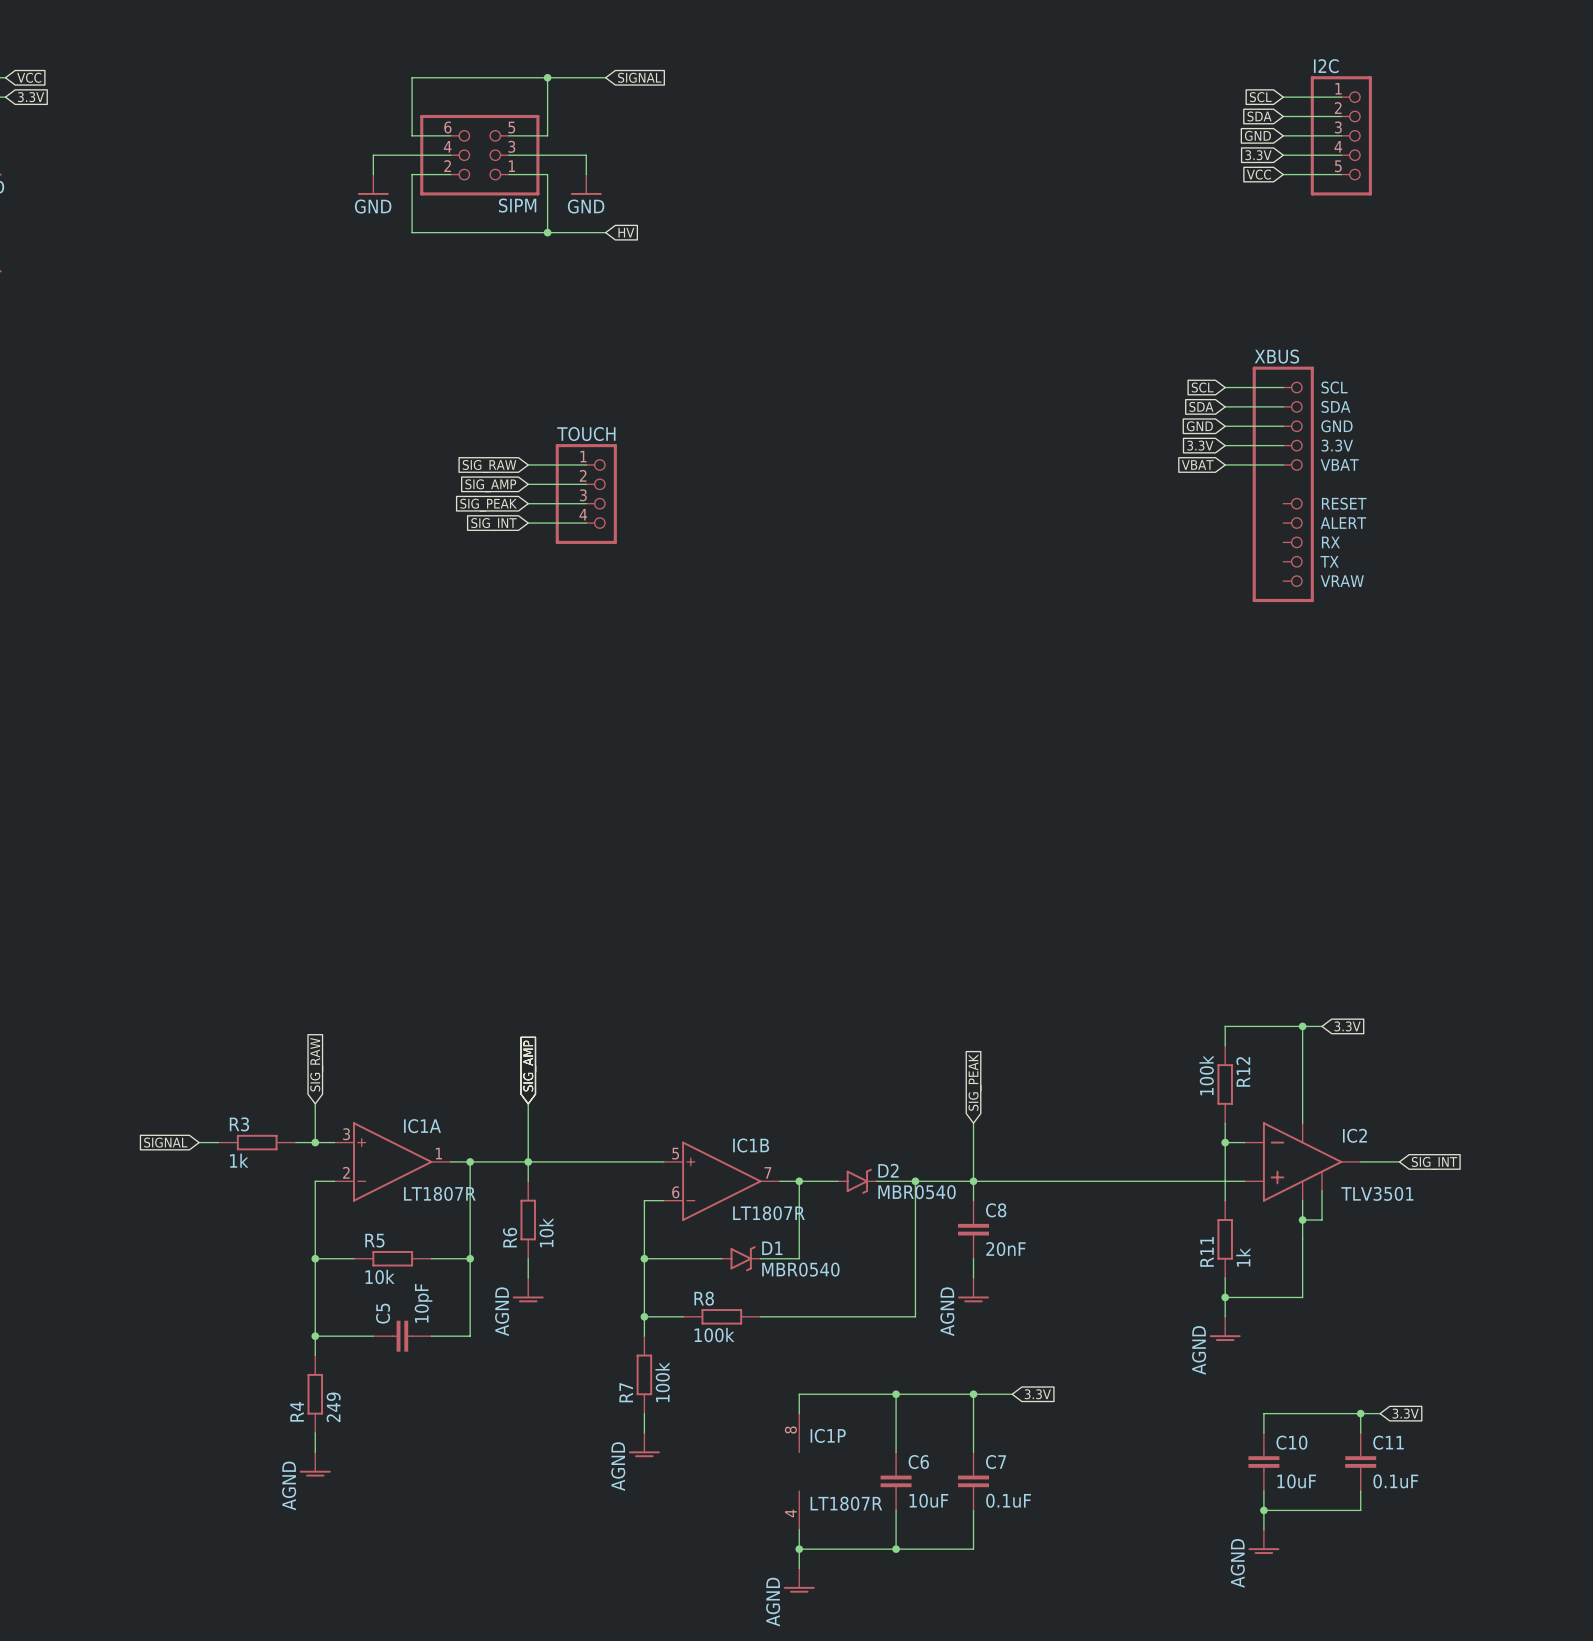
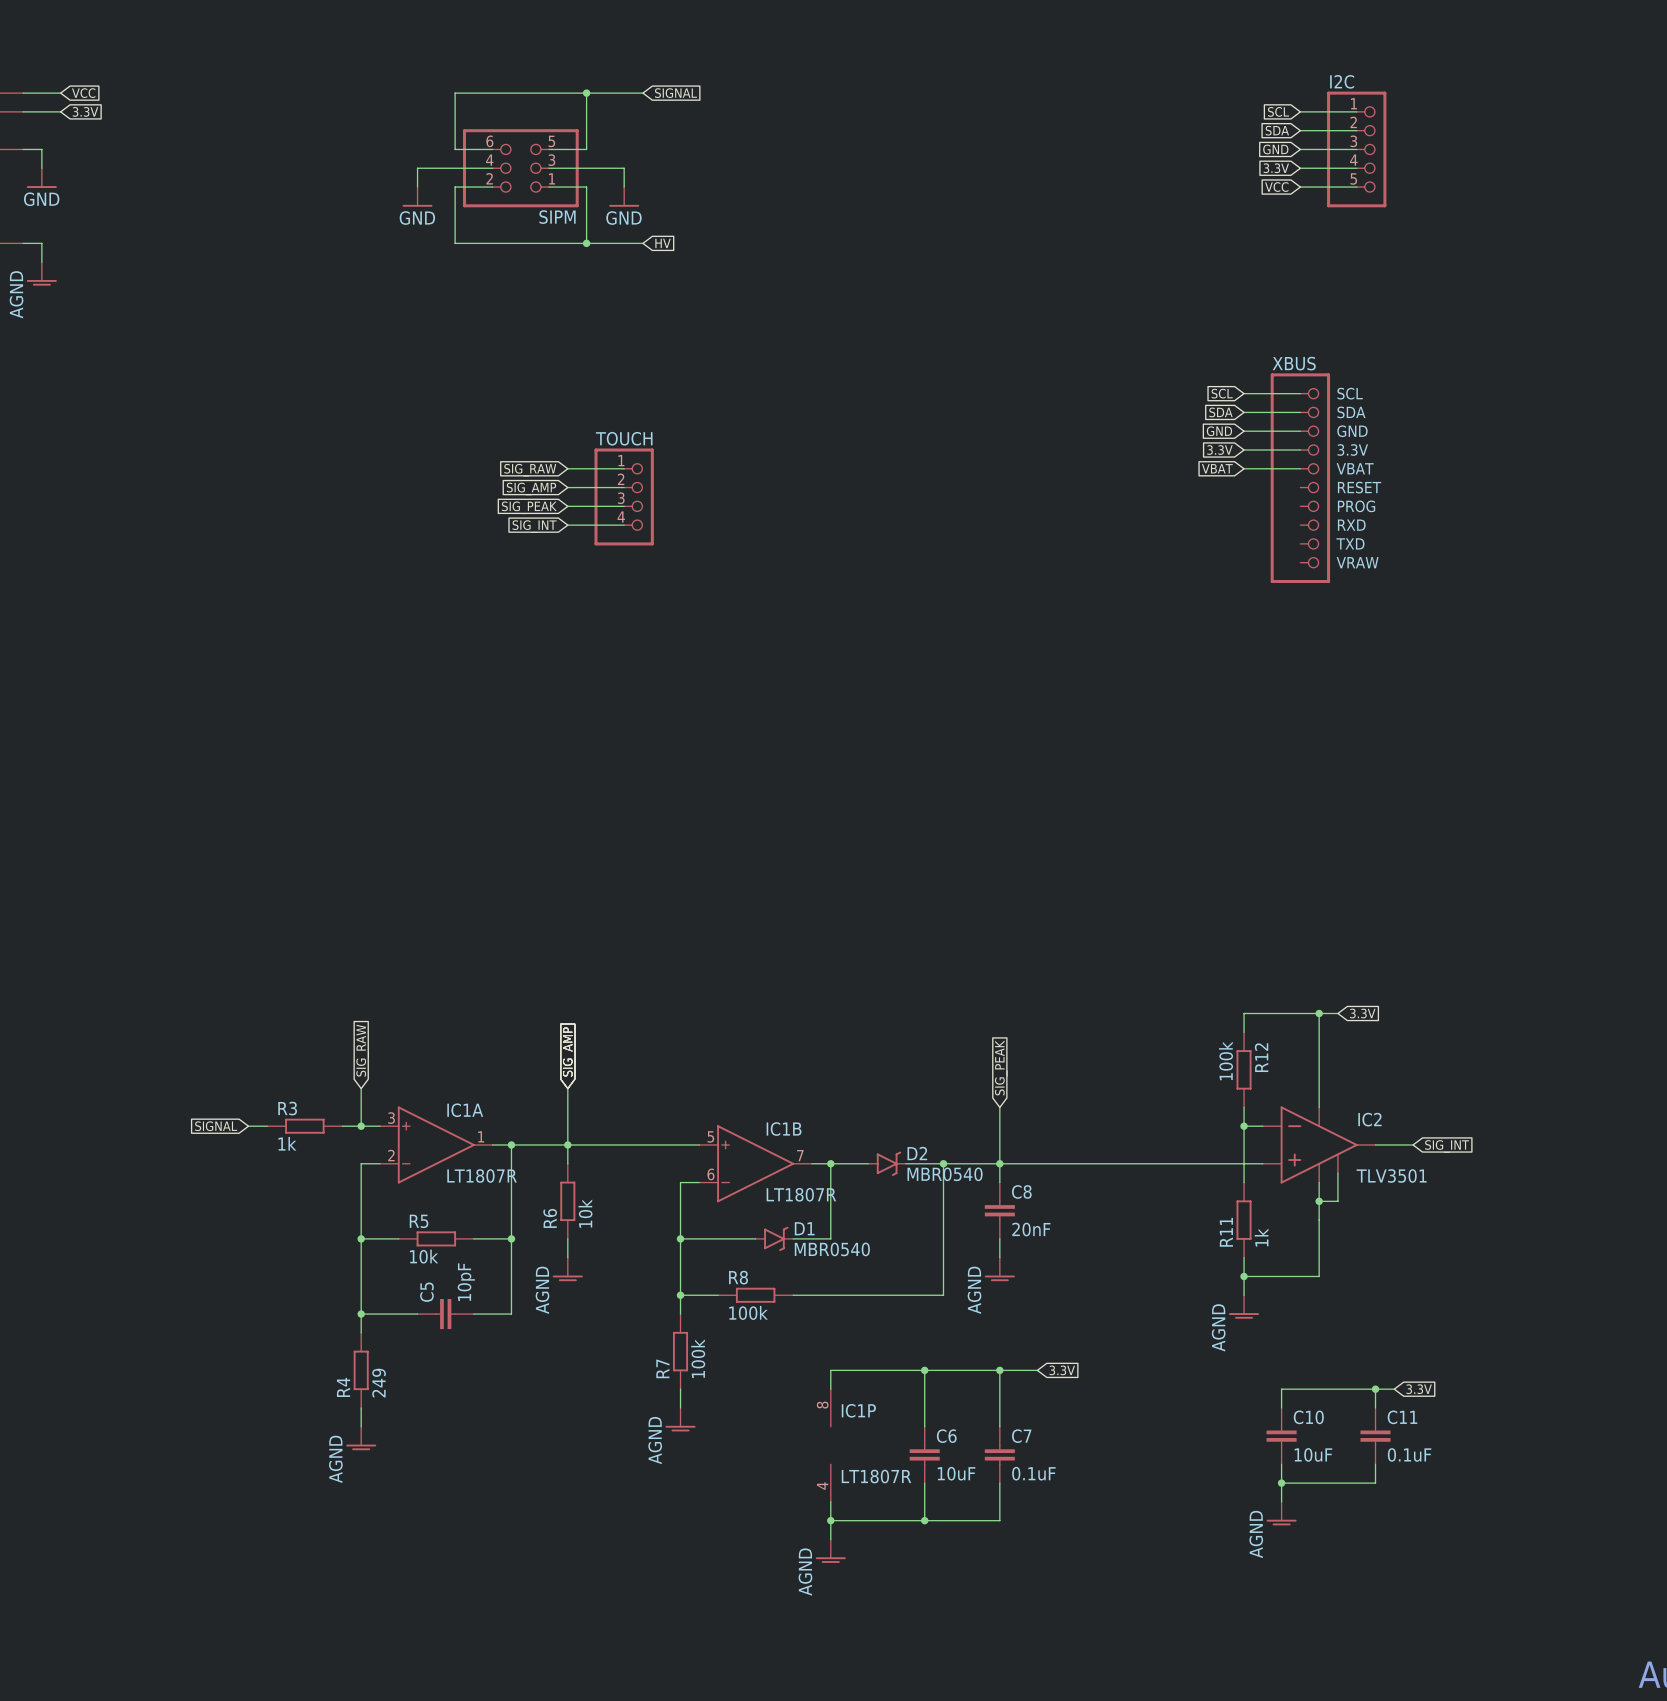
XBUS: none -> (1300, 478)
XBUS: (1283, 484) -> none

